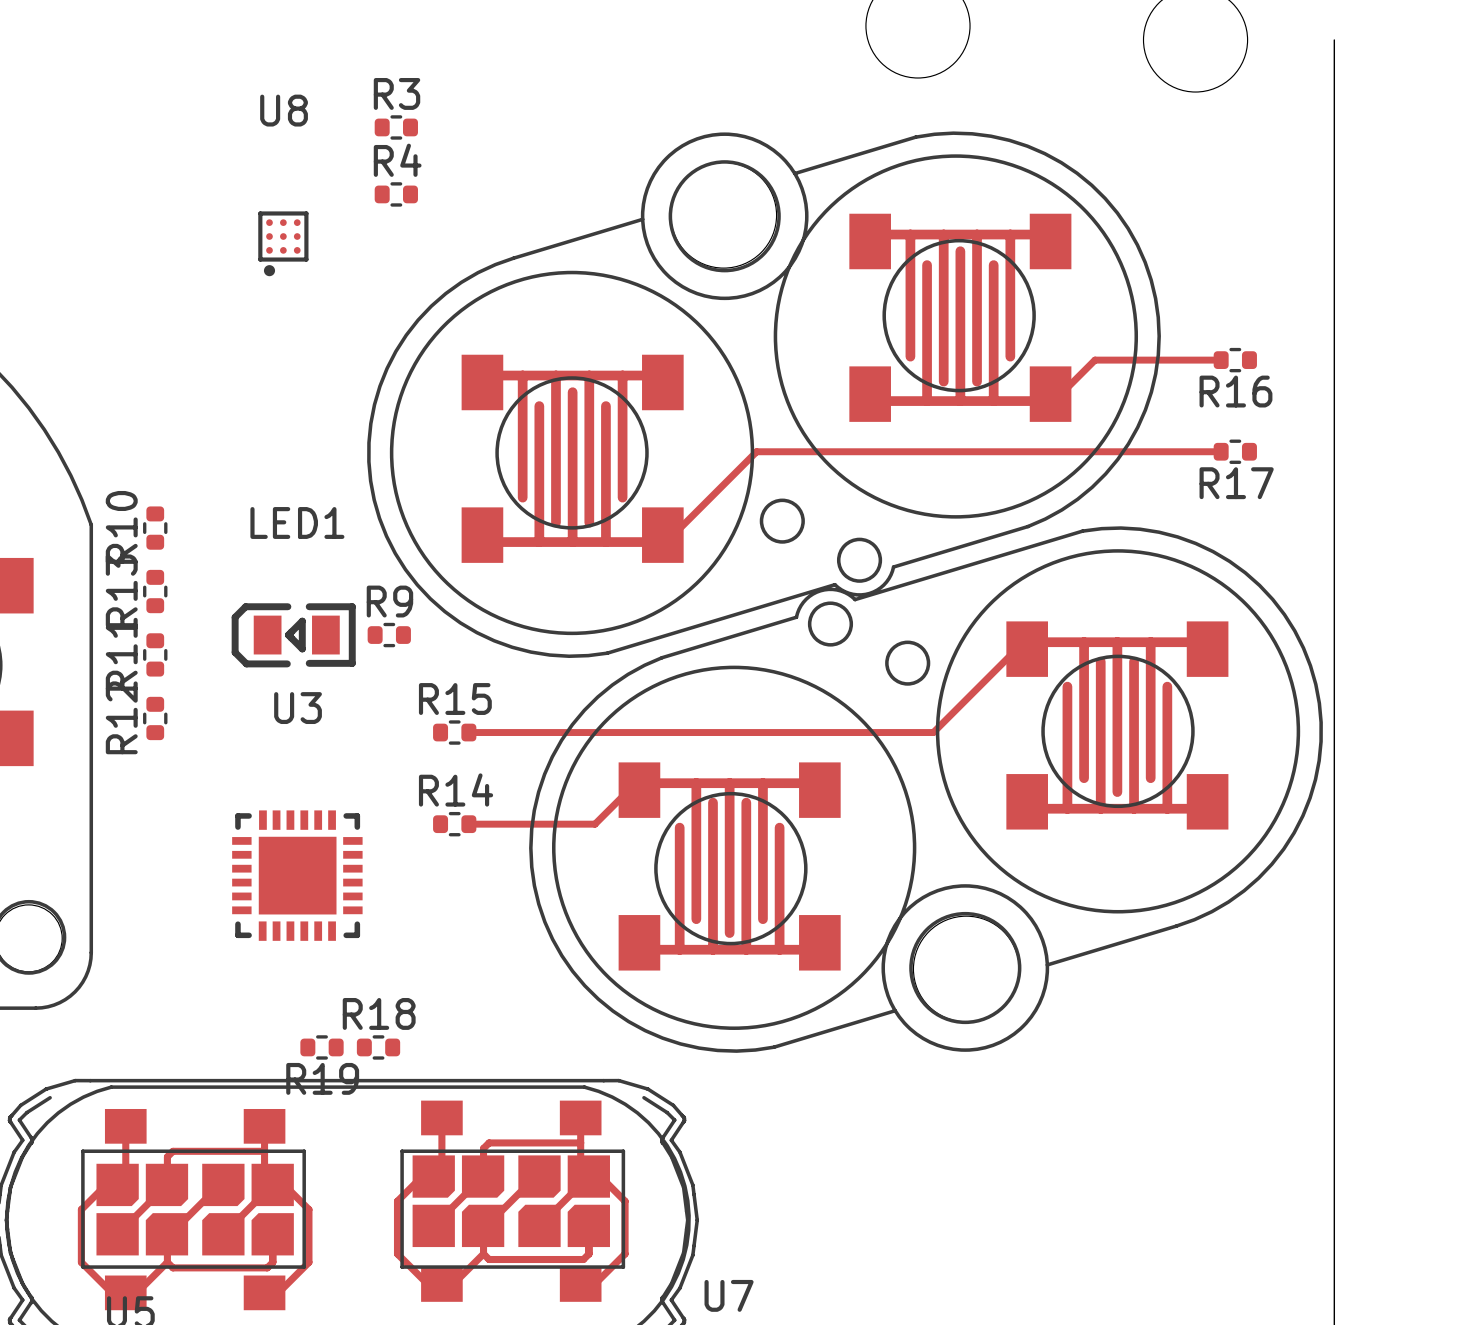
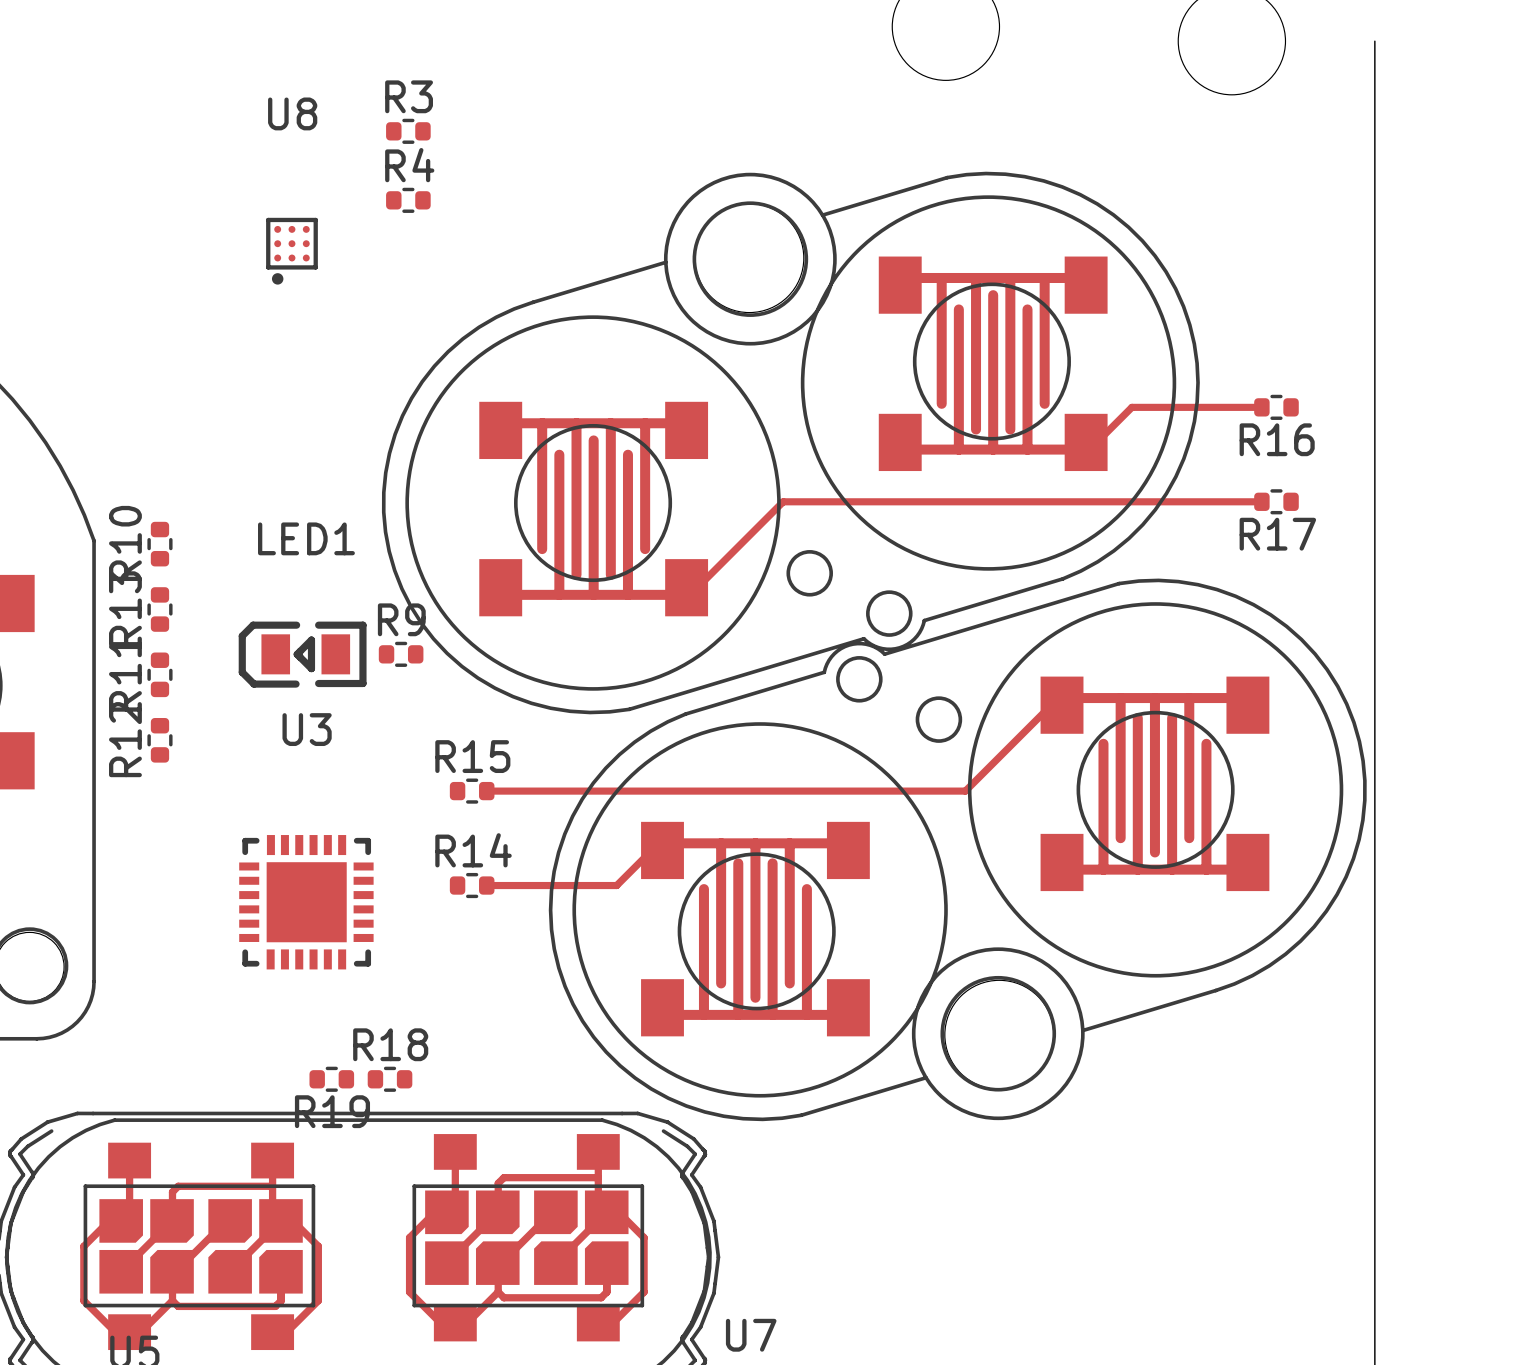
part position: (960, 317) -> (993, 363)
top track: (1221, 360) (1095, 360) (1060, 394) -> (1261, 407) (1131, 407) (1096, 442)
R16 position: (1235, 360) -> (1276, 407)
part position: (764, 394) -> (790, 443)
top track: (1221, 451) (756, 451) (673, 535) -> (1261, 501) (783, 501) (697, 587)
R17 position: (1235, 451) -> (1276, 501)
part position: (572, 458) -> (593, 509)
top track: (1016, 649) (933, 732) (468, 732) -> (1051, 705) (965, 791) (486, 791)
part position: (1117, 725) -> (1154, 783)
R15 position: (454, 732) -> (472, 791)
part position: (925, 789) -> (957, 849)
top track: (629, 790) (595, 824) (468, 824) -> (651, 850) (616, 885) (486, 885)
R14 position: (454, 824) -> (472, 885)
part position: (729, 866) -> (755, 929)

